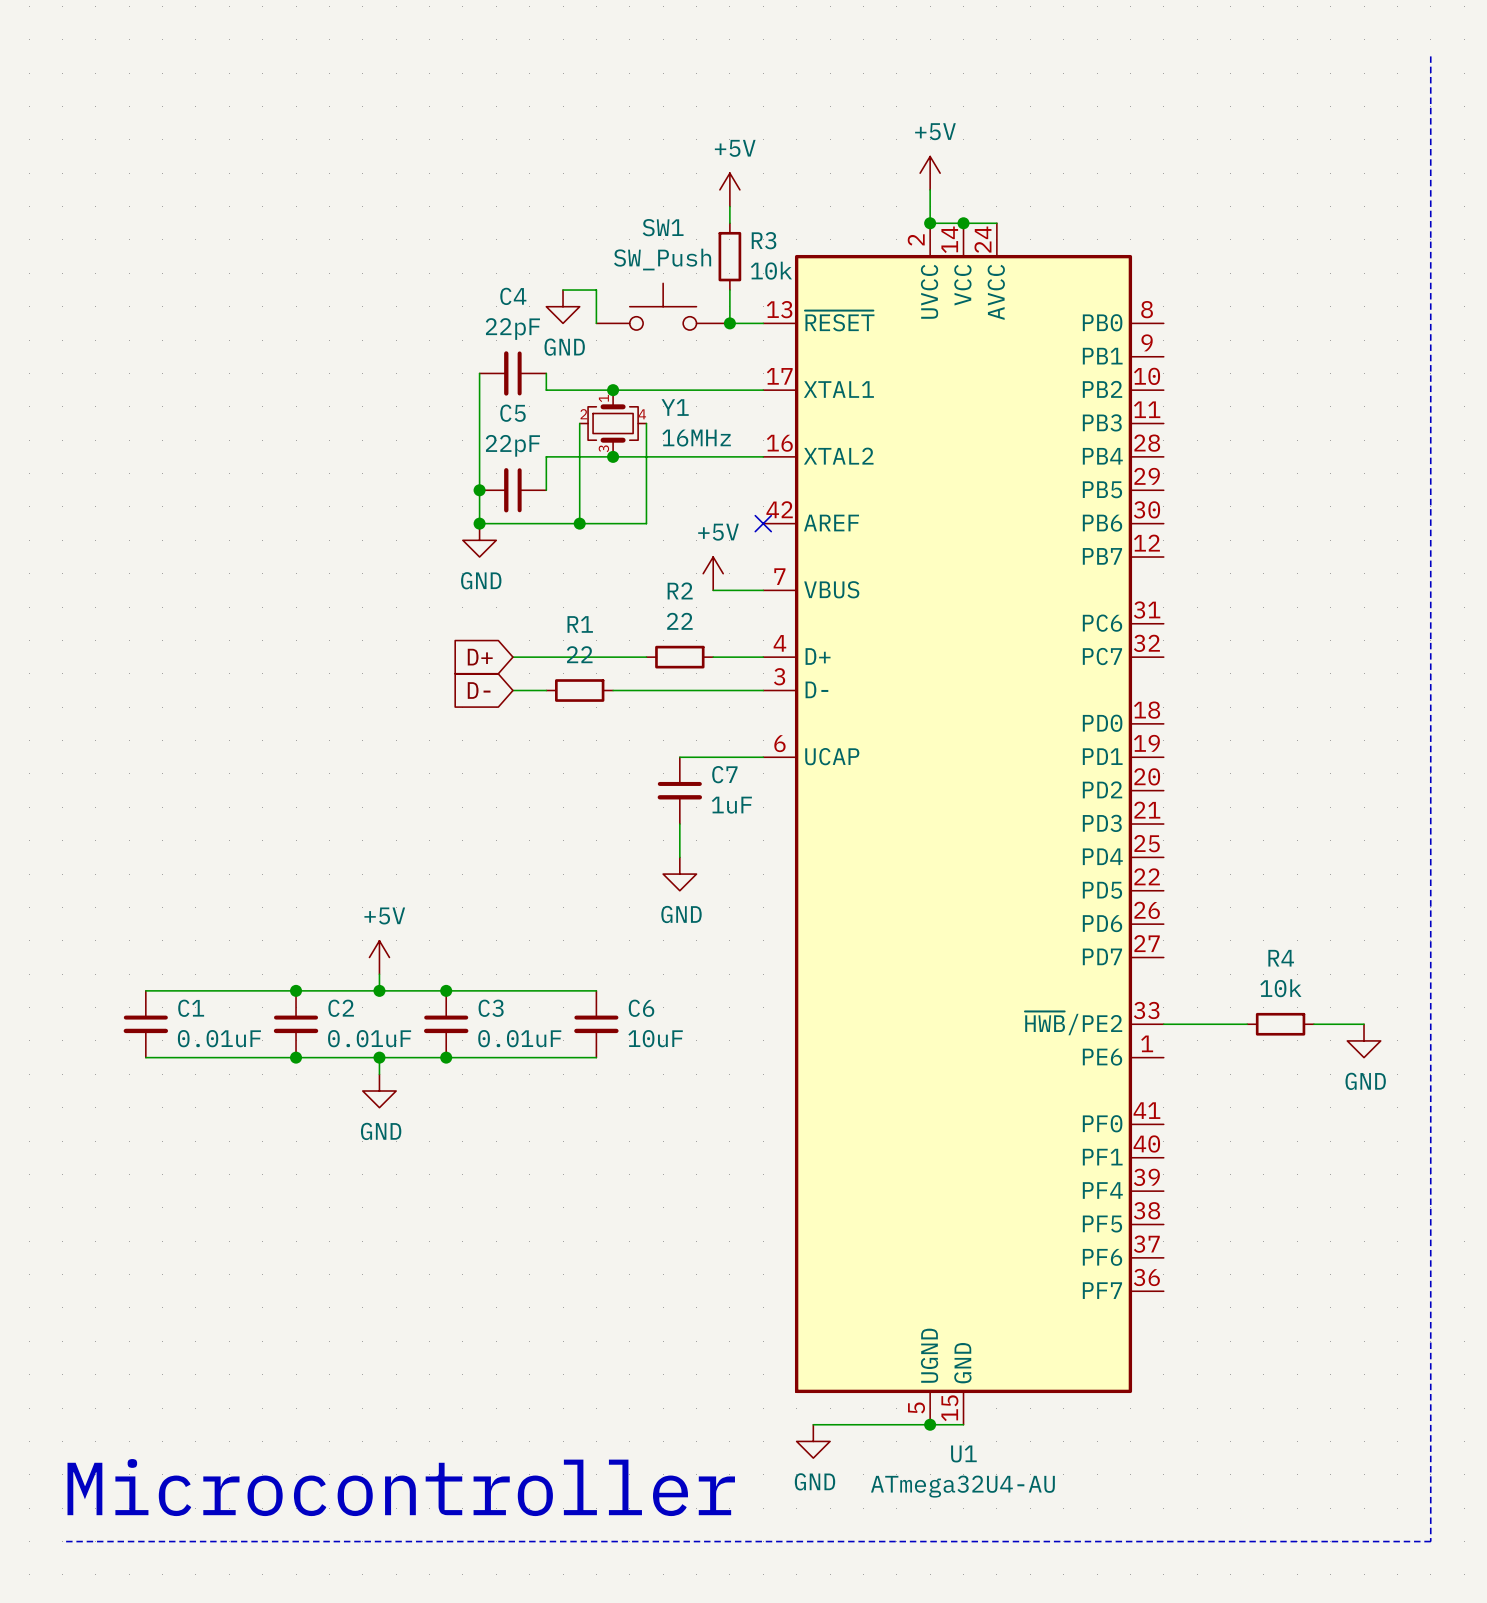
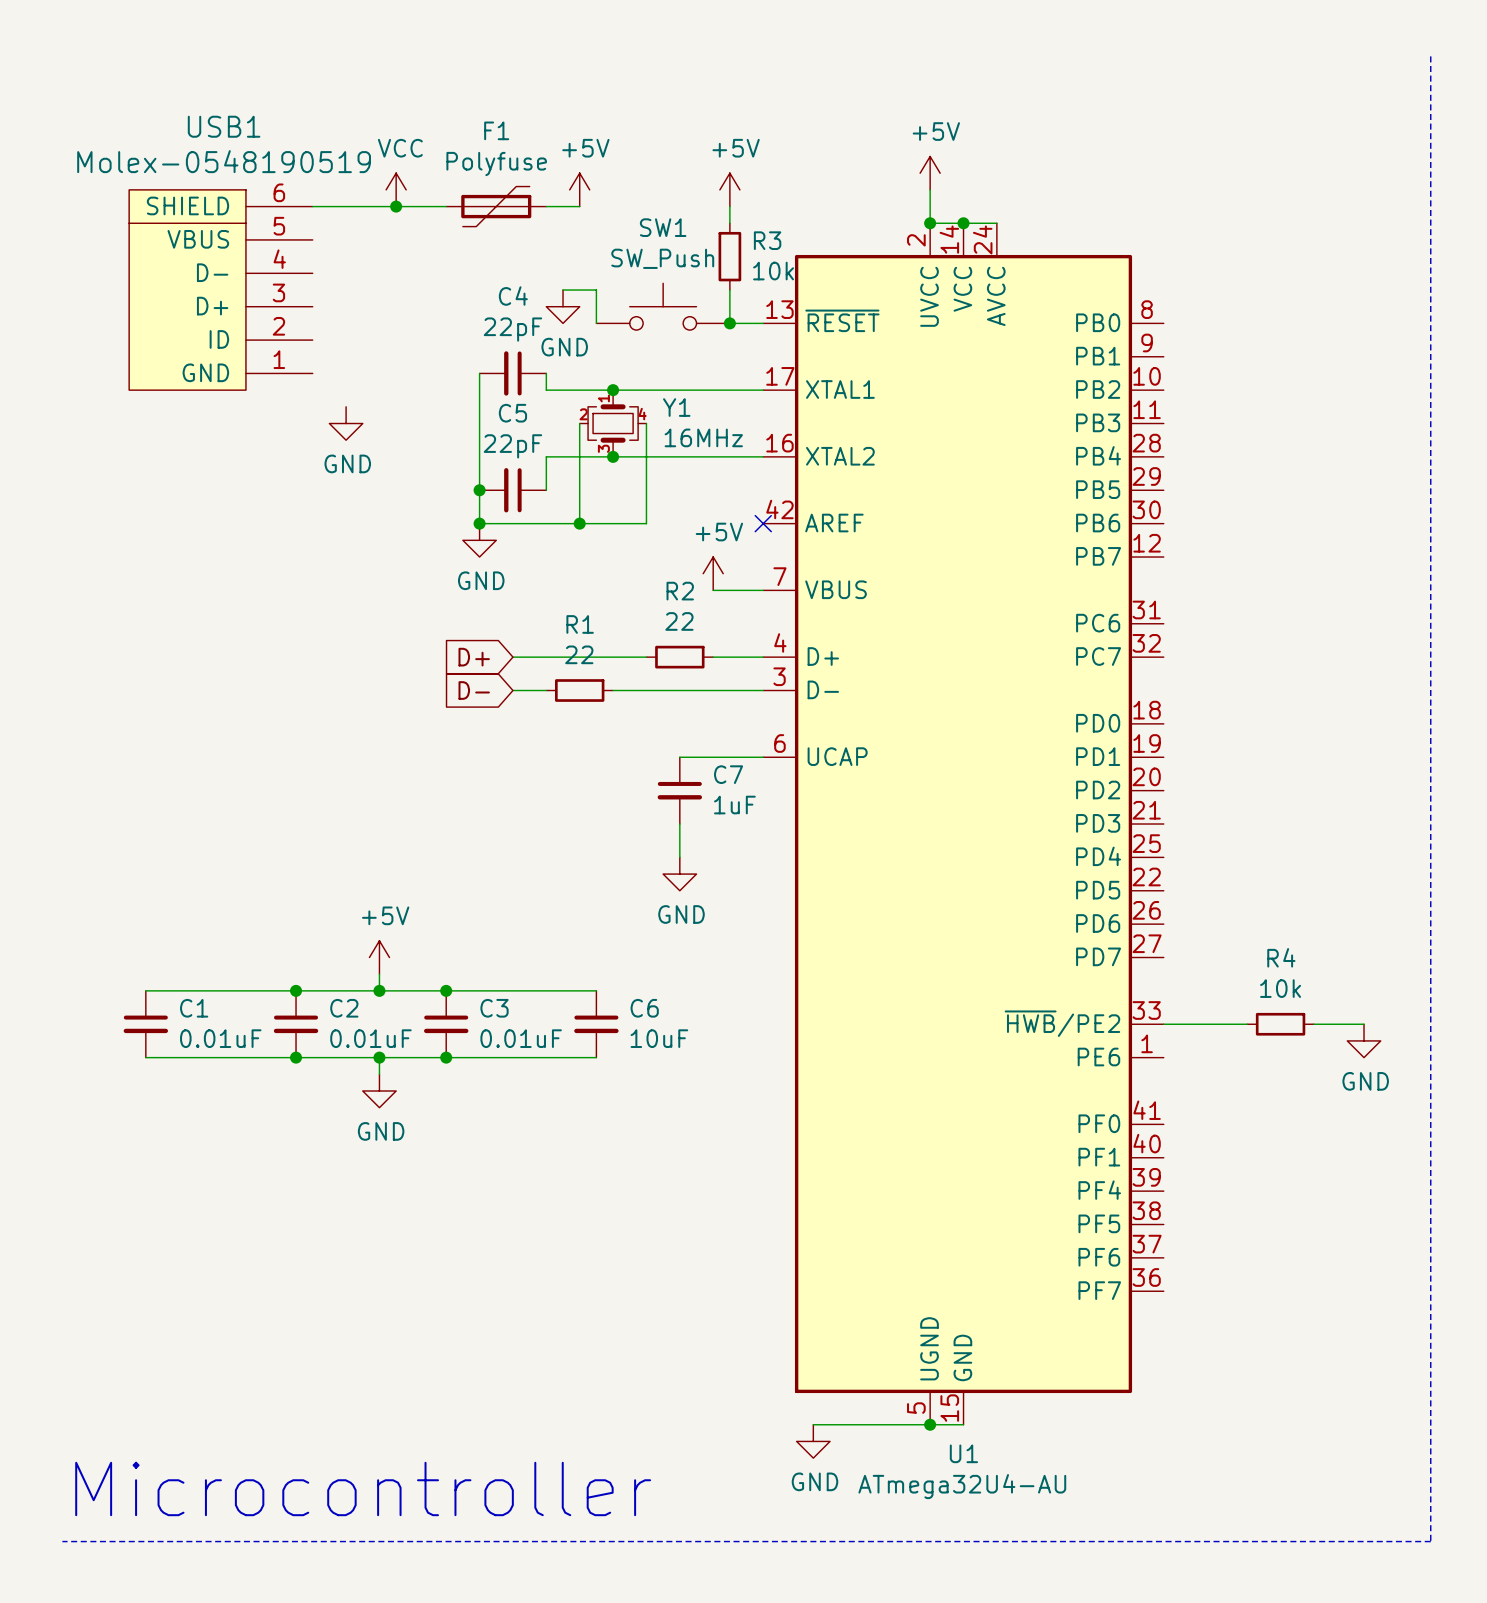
power symbol: none -> VCC (396, 189)
power symbol: none -> +5V (579, 189)
wire: none -> (312, 206) (446, 206)
junction: none -> (396, 206)
F1: none -> Polyfuse (496, 206)
wire: none -> (546, 206) (579, 206)
USB1: none -> Molex-0548190519 (220, 290)
power symbol: none -> GND (346, 423)

